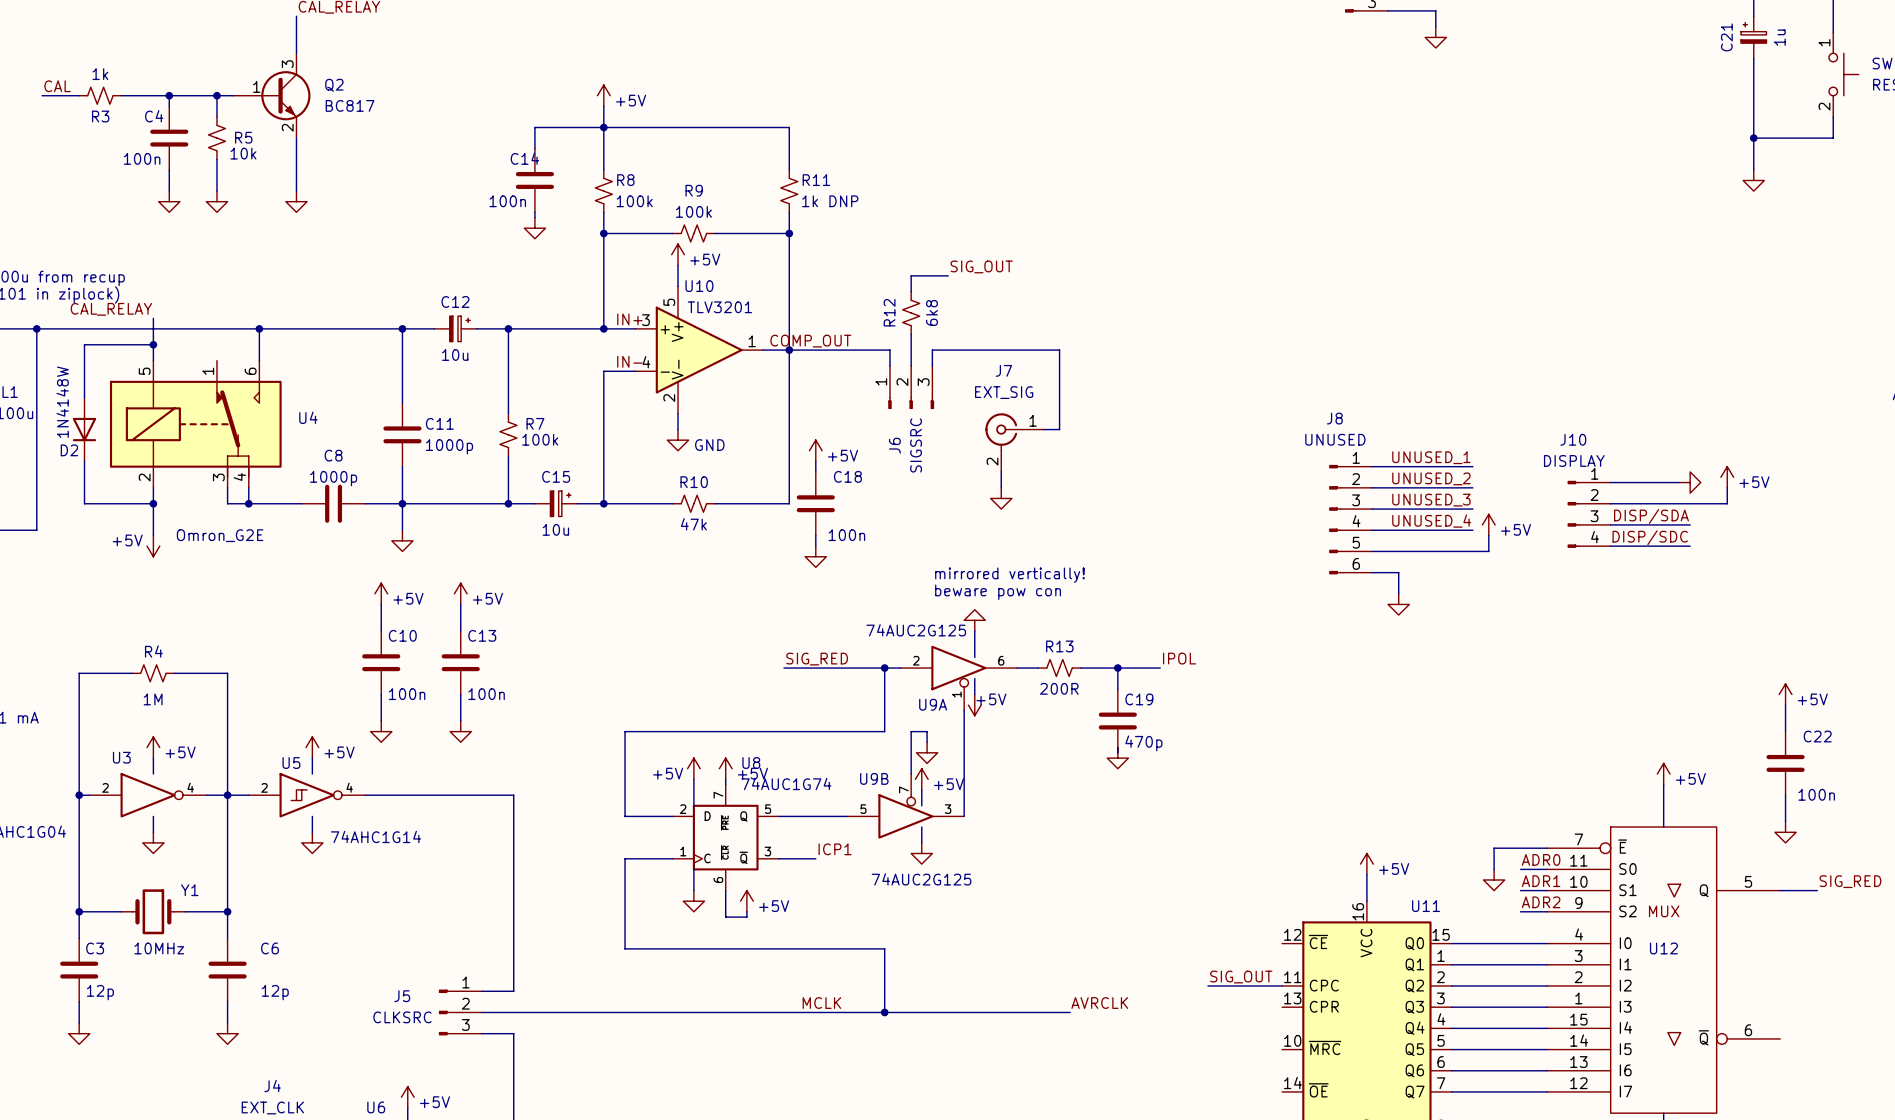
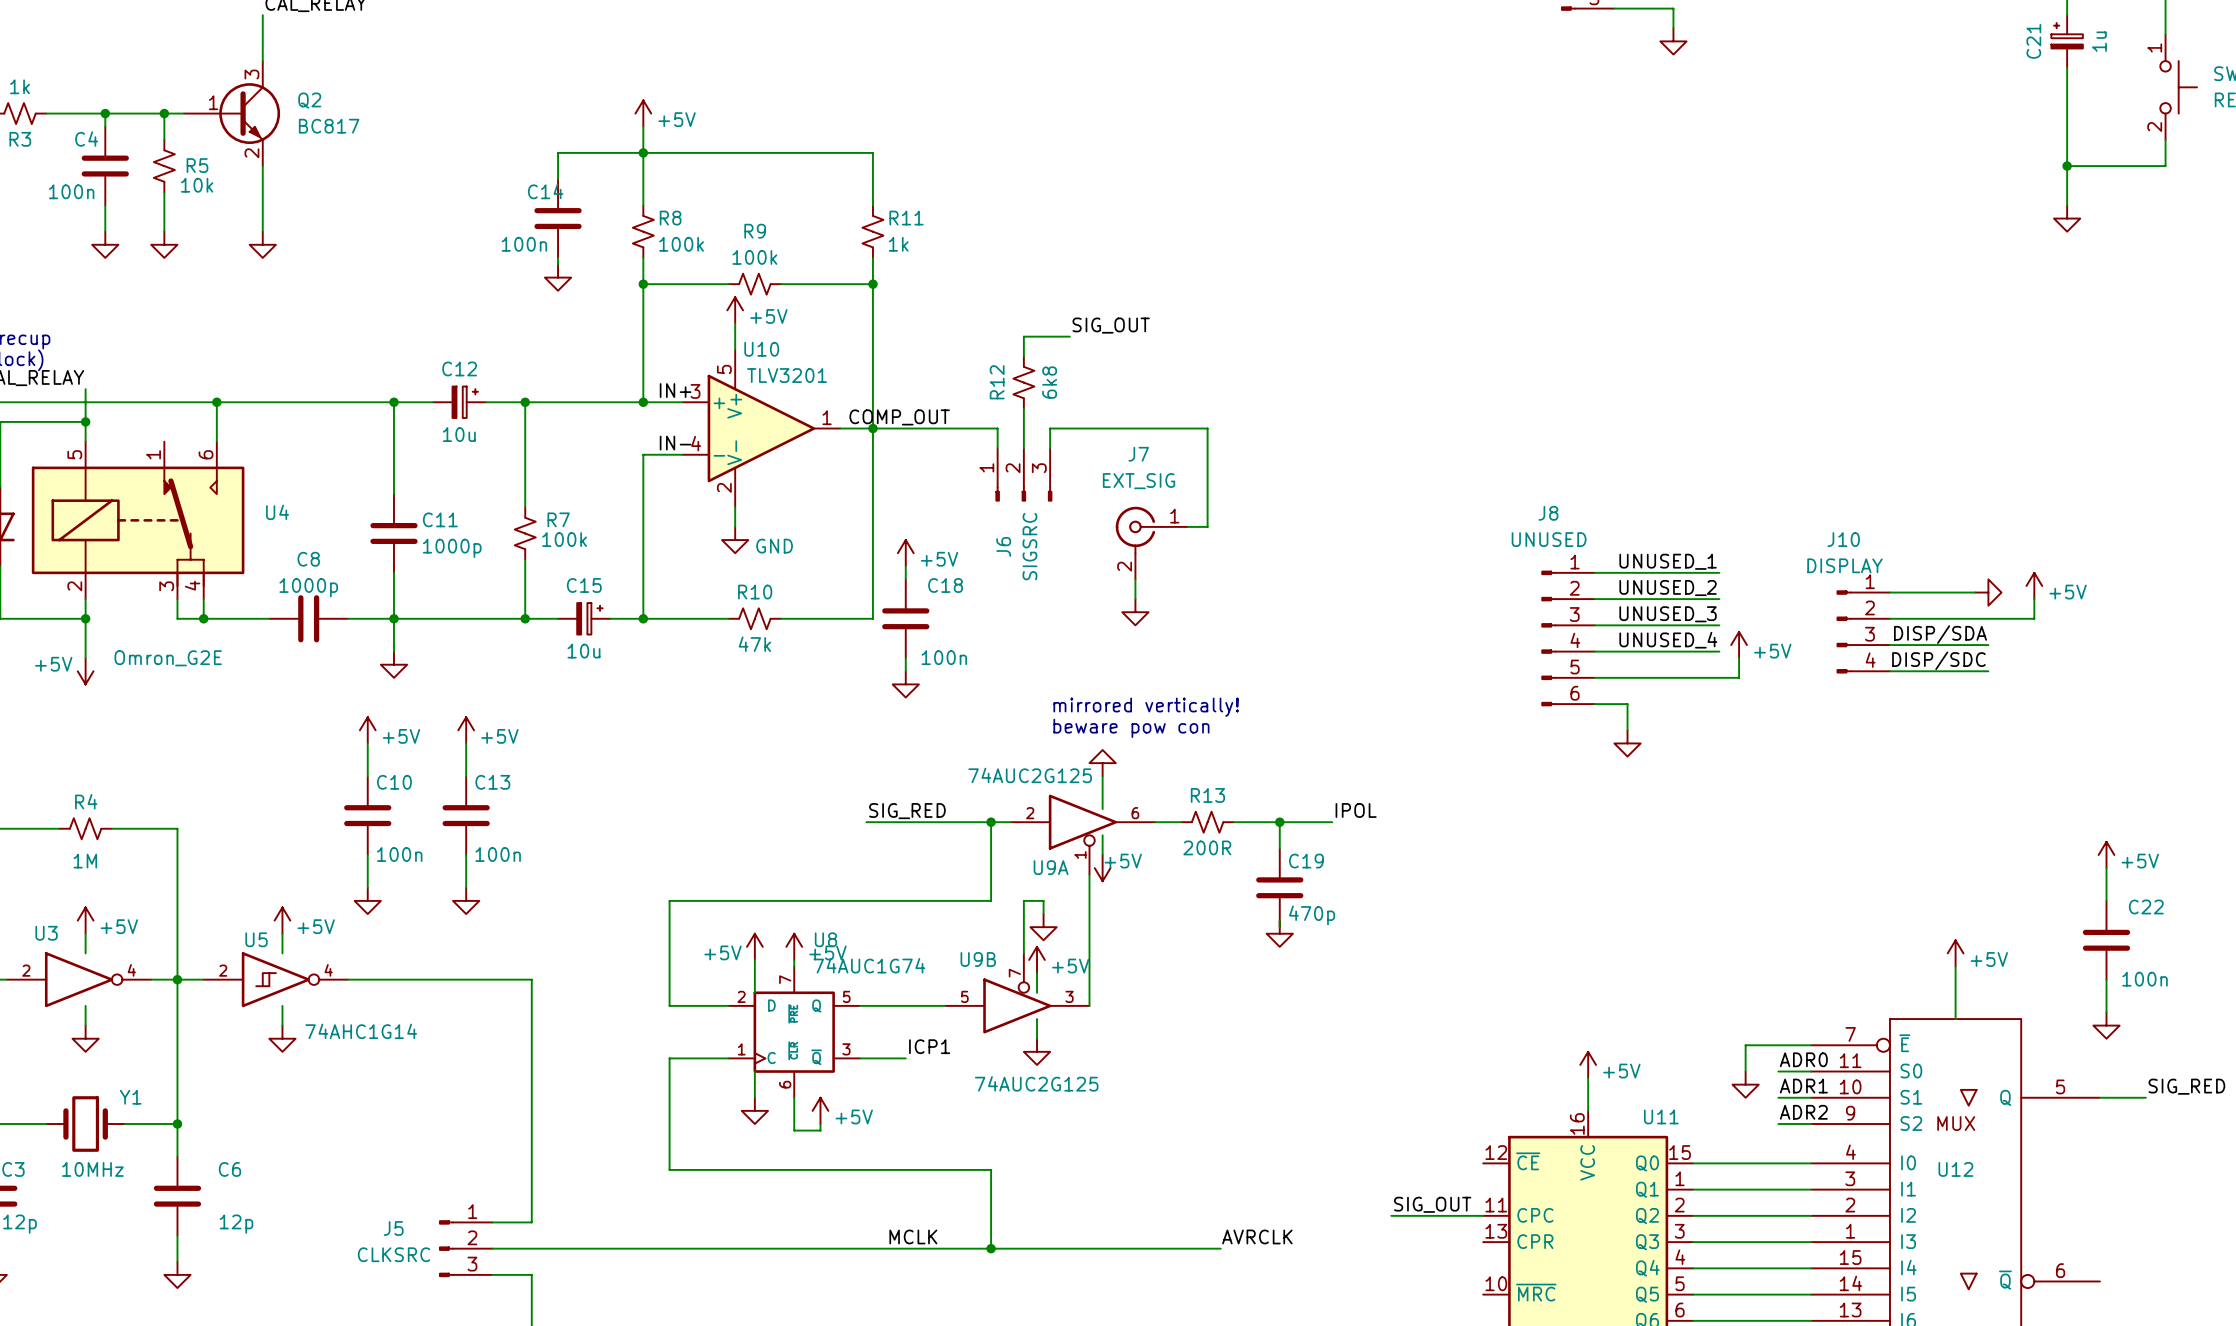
R11 value: 1k DNP (830, 201) -> 1k (898, 244)

